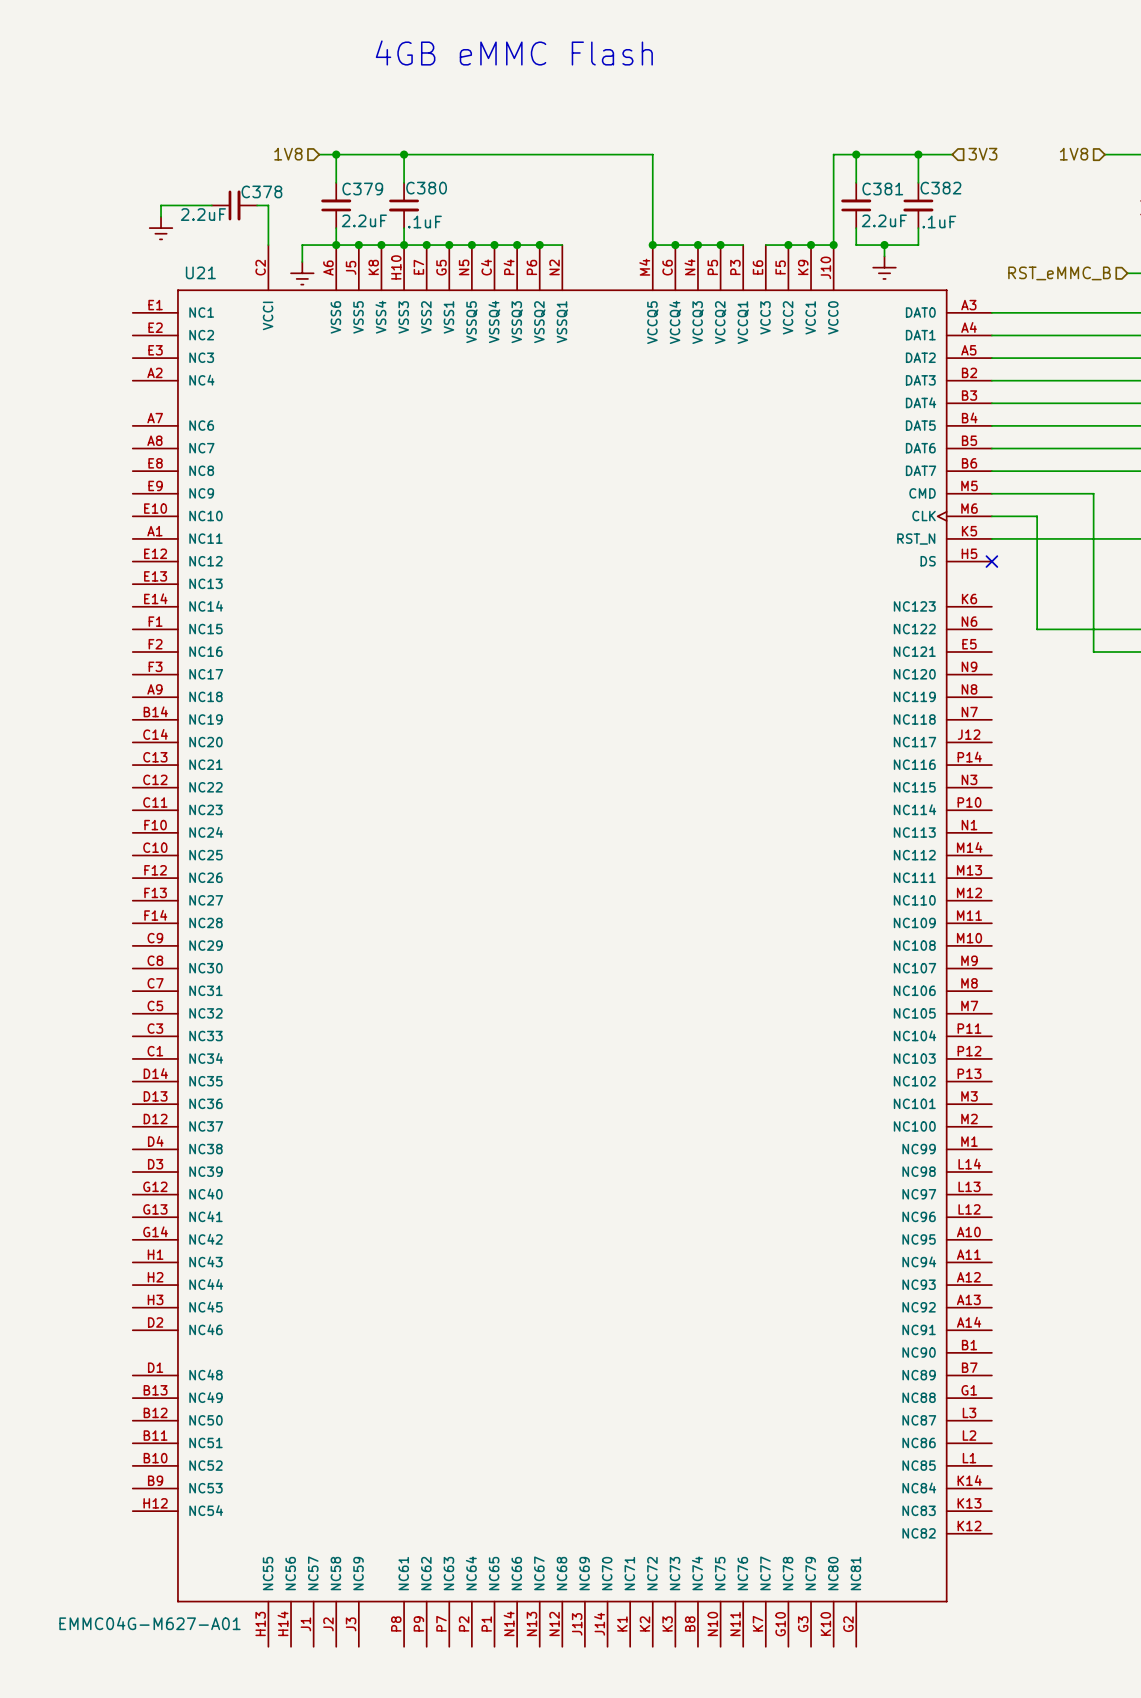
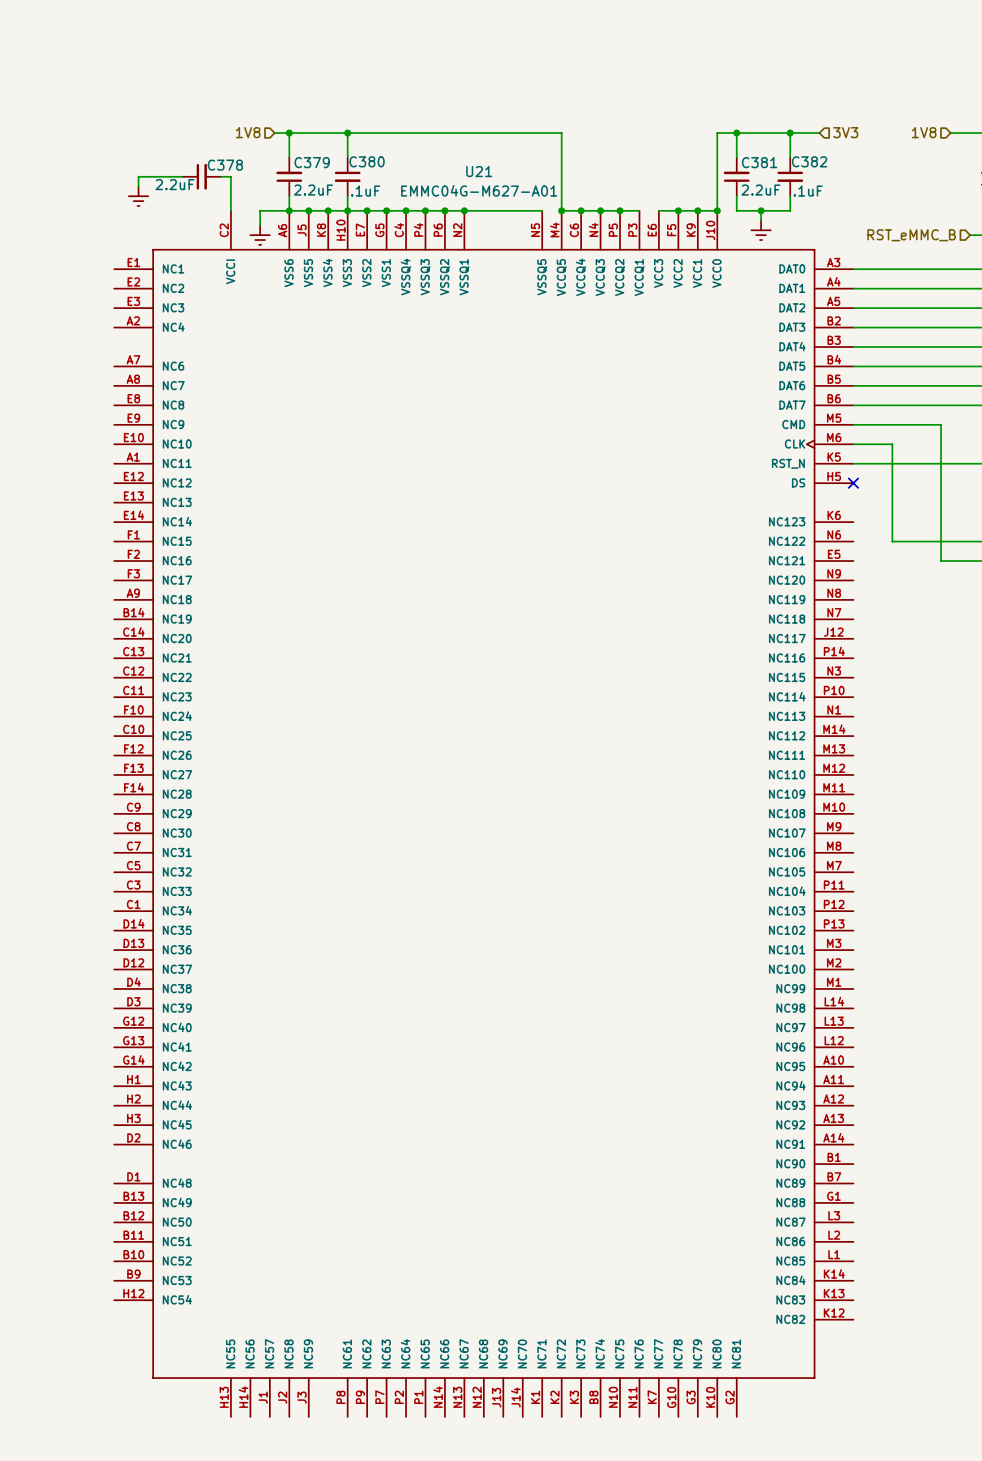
text: 4GB eMMC Flash (514, 52) -> none
U21 symbol: [132, 245, 992, 1647] -> [114, 210, 854, 1417]
wire: none -> (483, 210) (542, 210)
U21 name position: U21 (200, 272) -> U21 (479, 171)
U21 value position: EMMC04G-M627-A01 (149, 1623) -> EMMC04G-M627-A01 (479, 190)

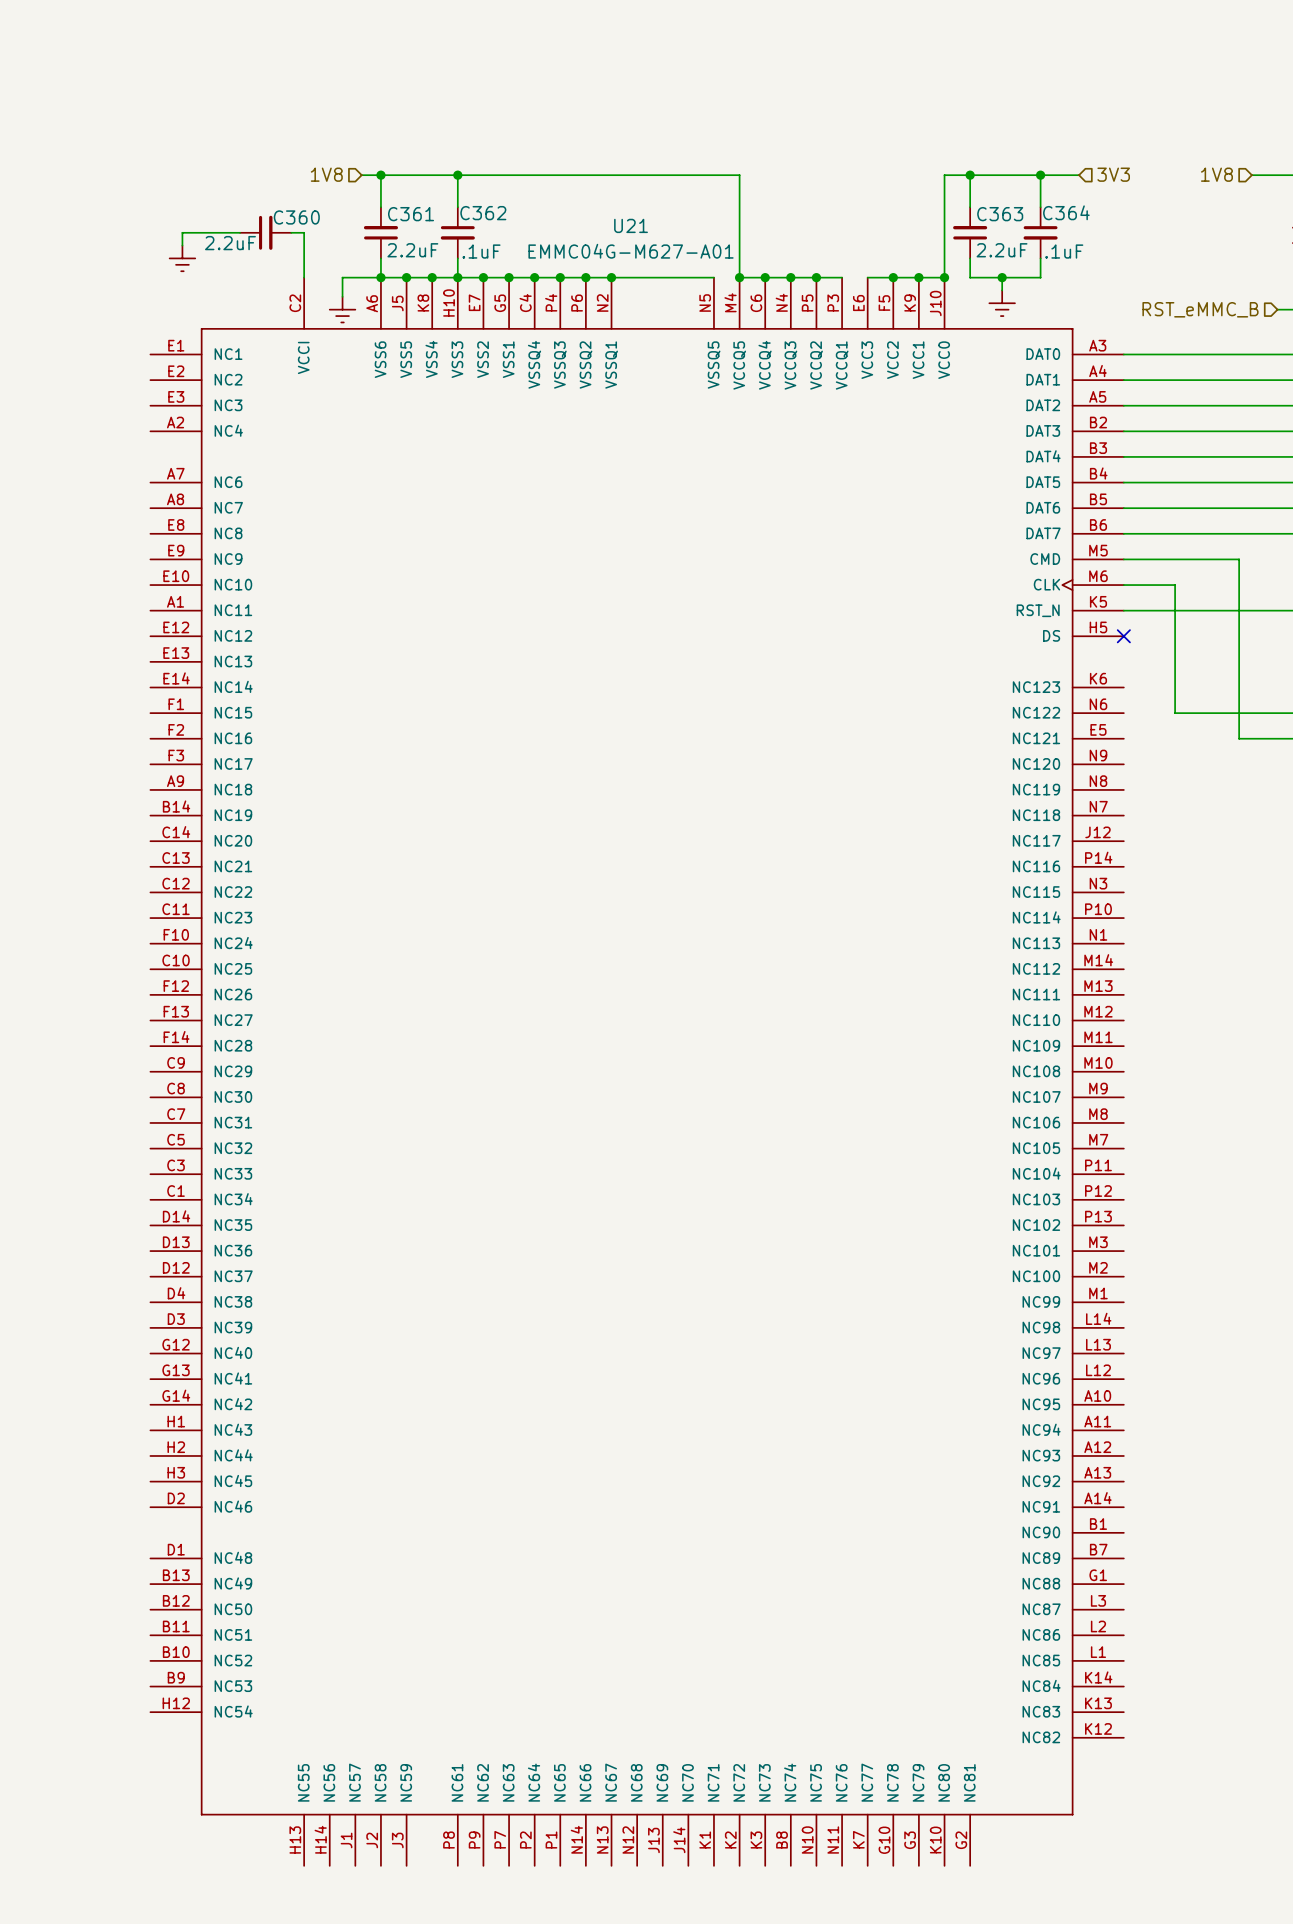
C380 name: C380 (367, 161) -> C362 (483, 213)
C382 name: C382 (809, 161) -> C364 (1066, 212)
C379 name: C379 (312, 162) -> C361 (411, 214)
C381 name: C381 (759, 162) -> C363 (1000, 214)
C378 name: C378 (225, 165) -> C360 (296, 217)

